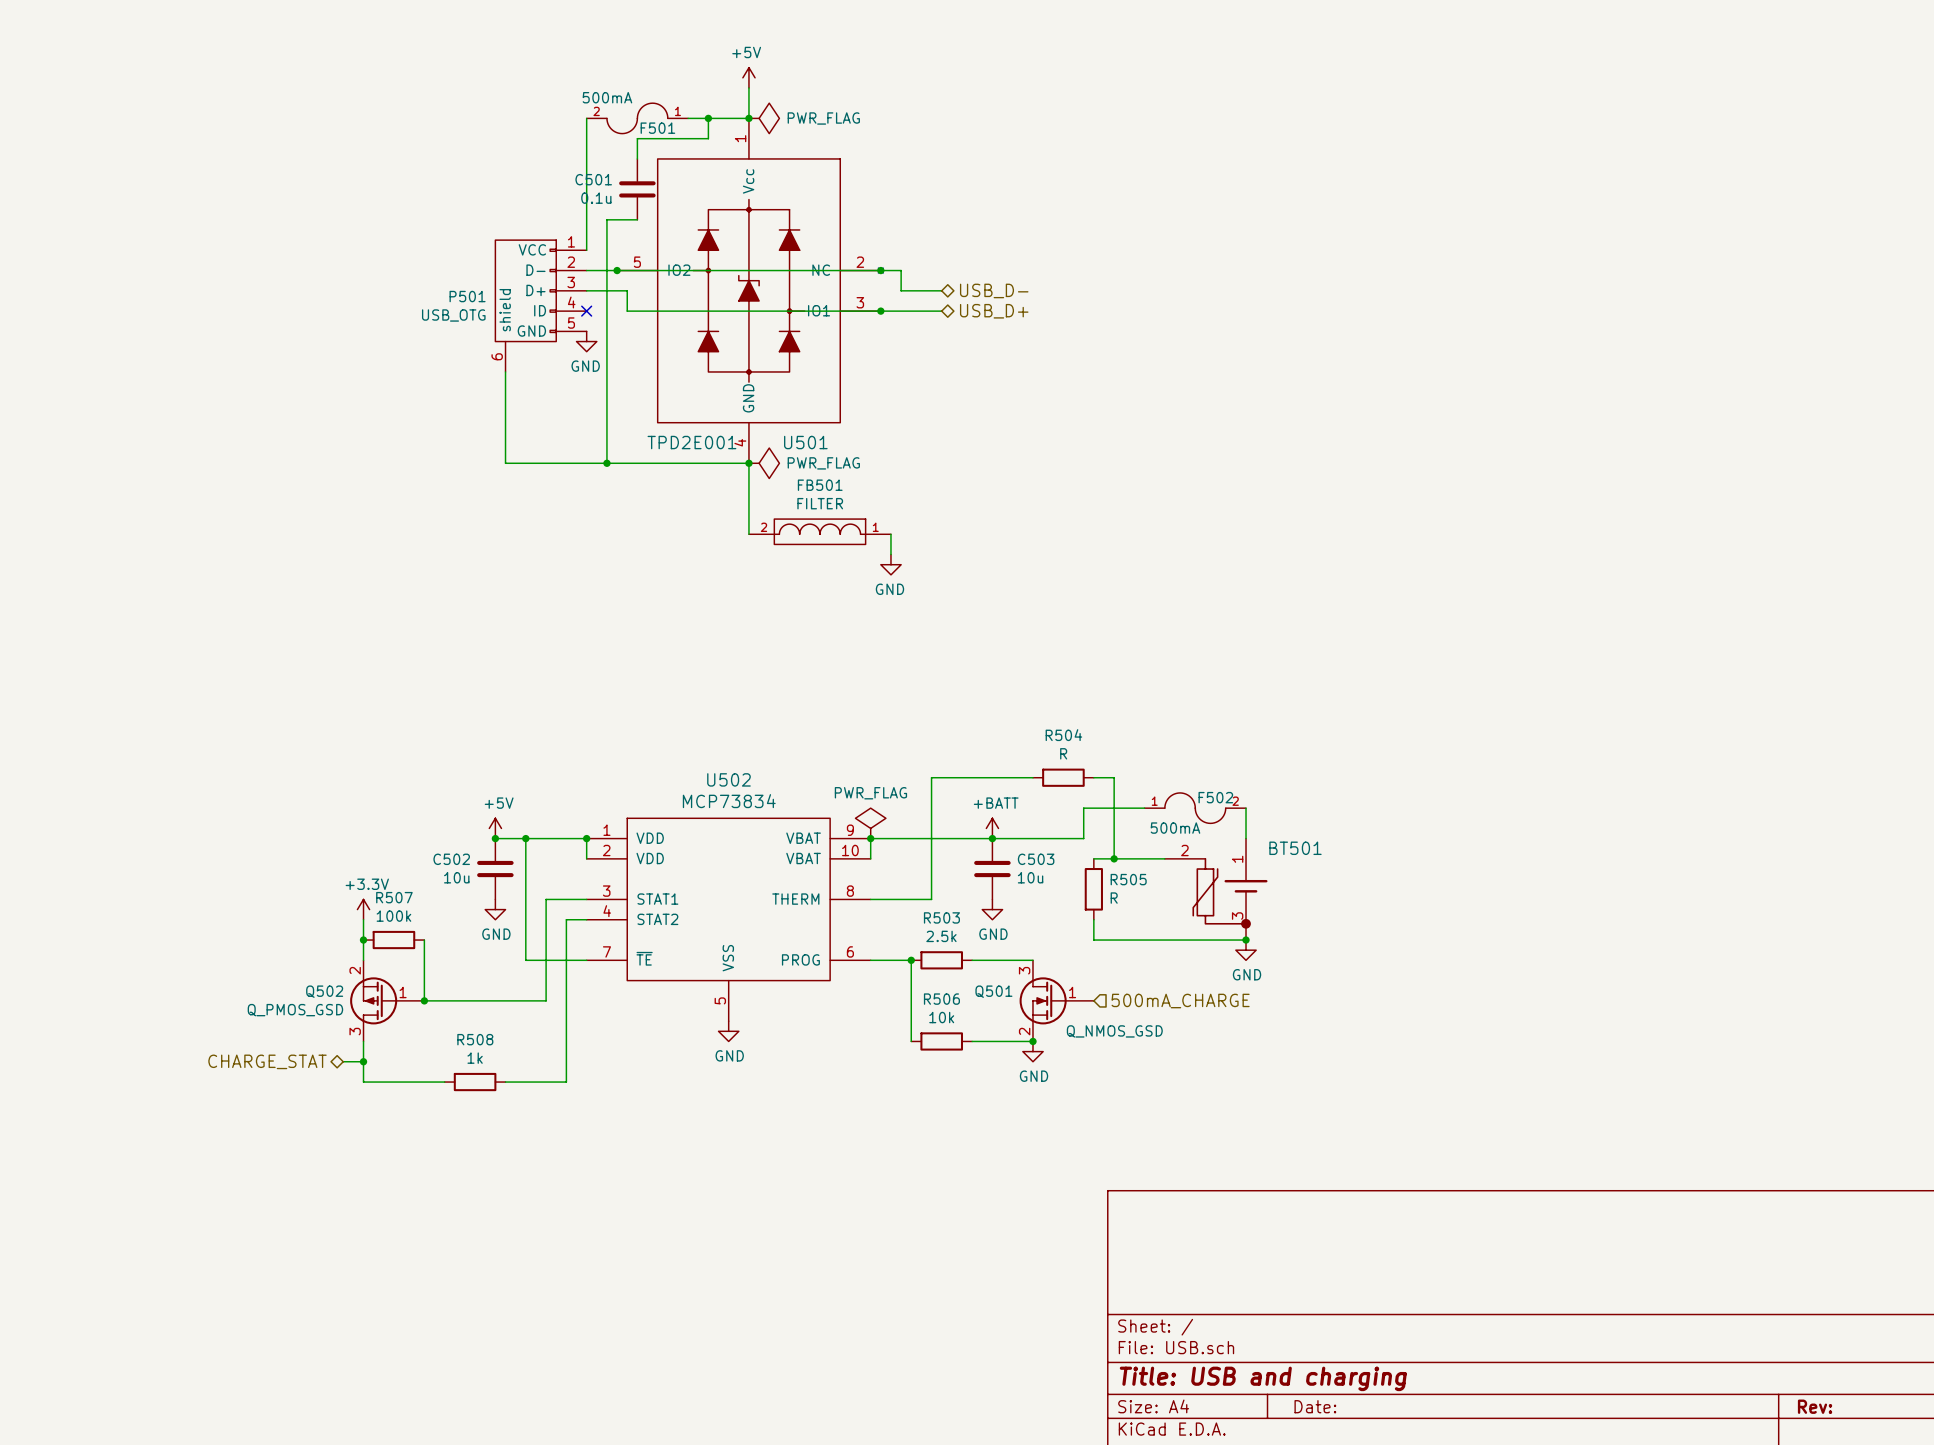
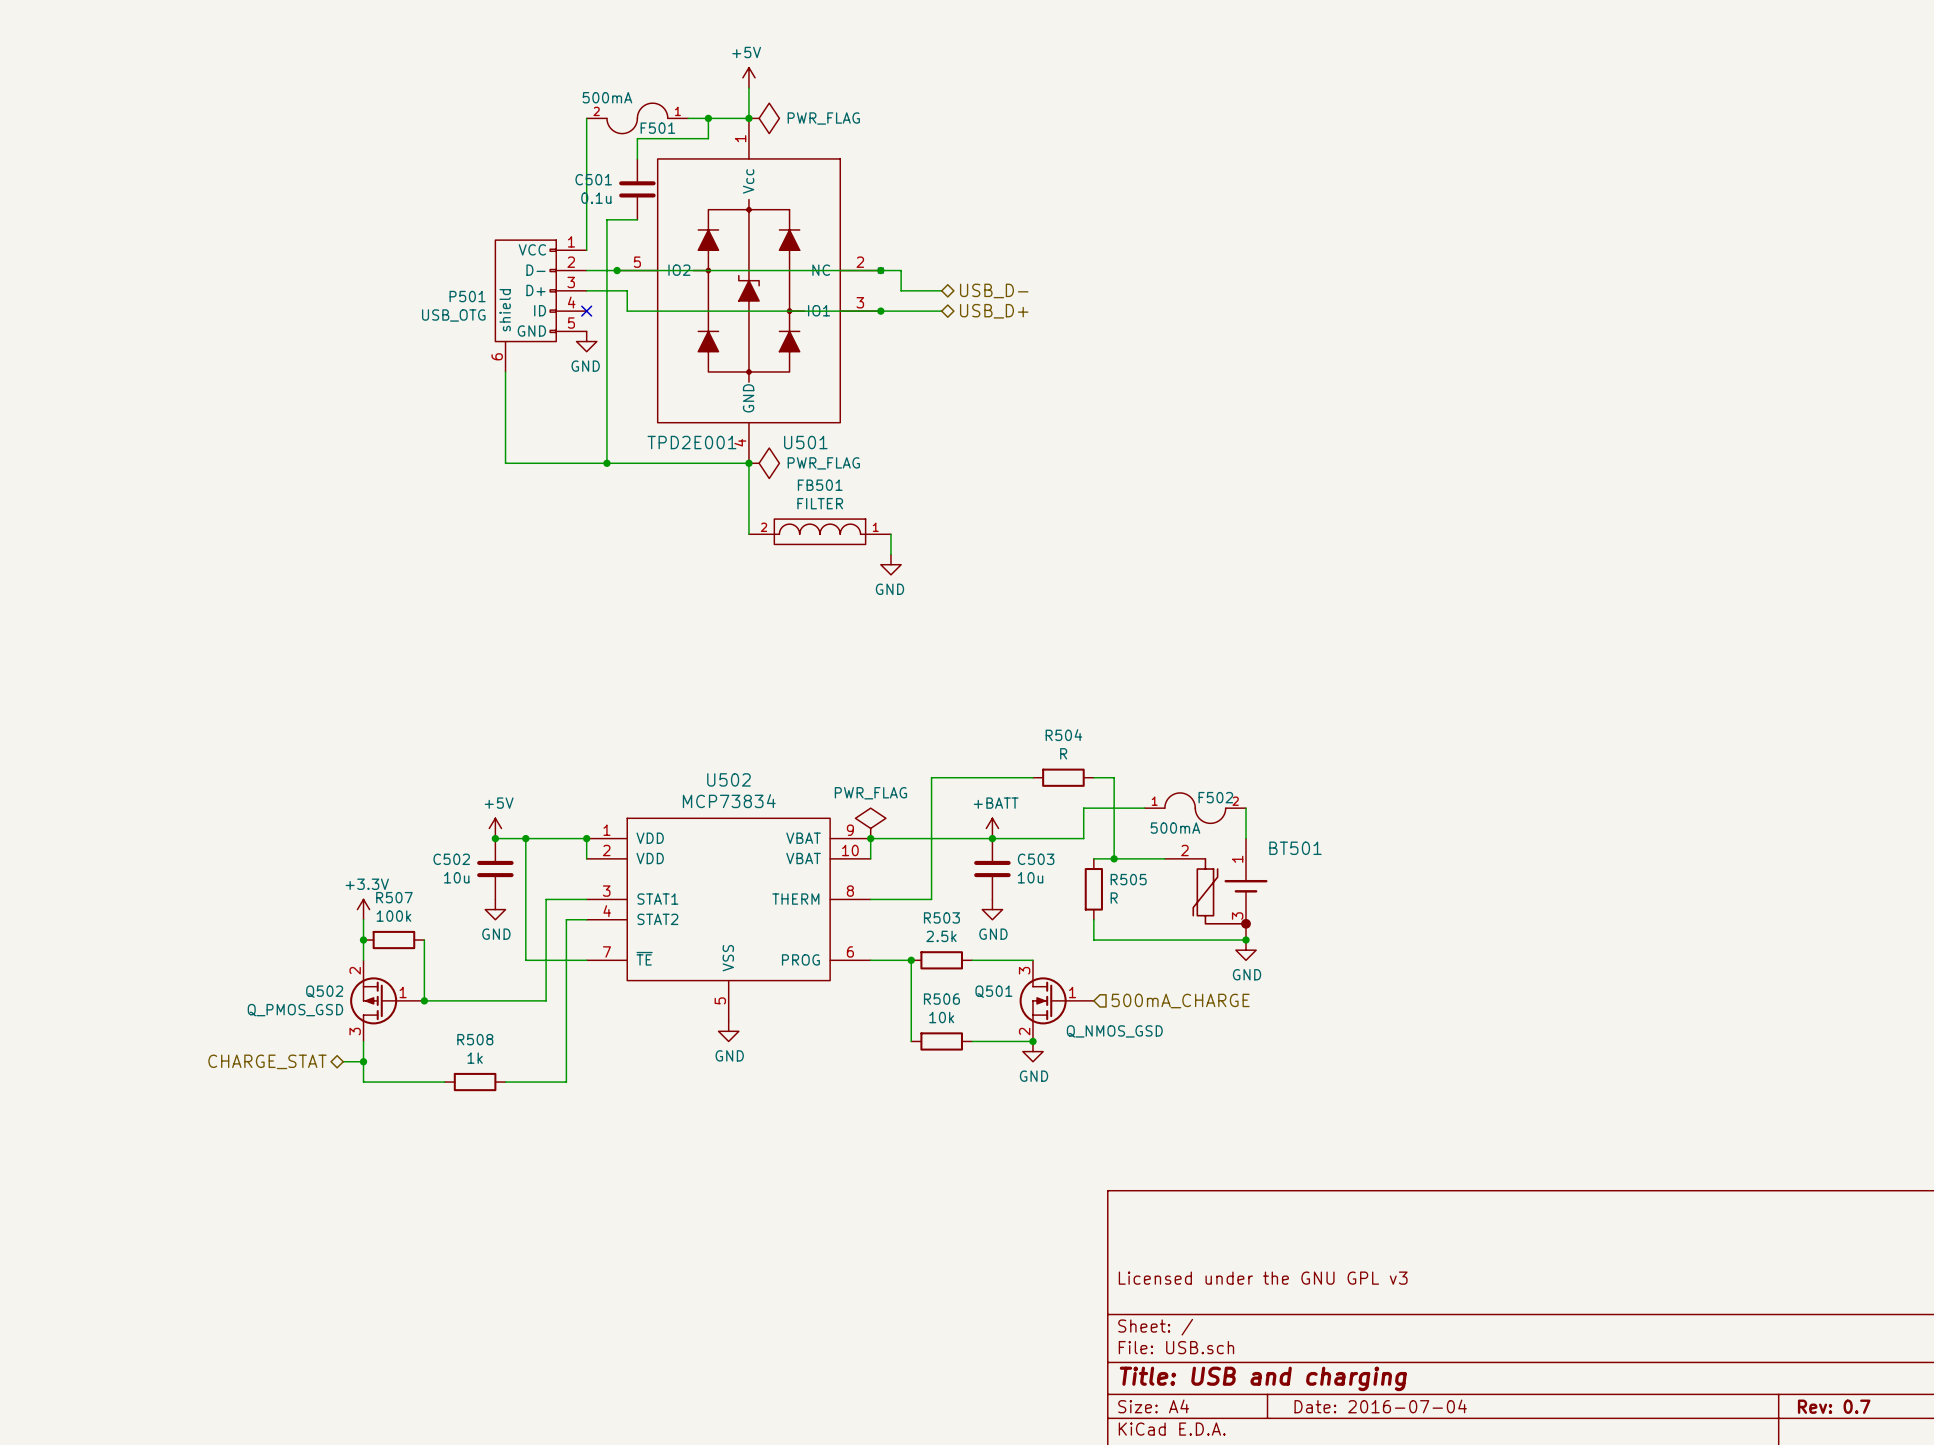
title block: none -> Licensed under the GNU GPL v3 (1263, 1278)
title block: Date: (1315, 1406) -> Date: 2016-07-04 (1380, 1406)
title block: Rev: (1815, 1406) -> Rev: 0.7 (1834, 1406)

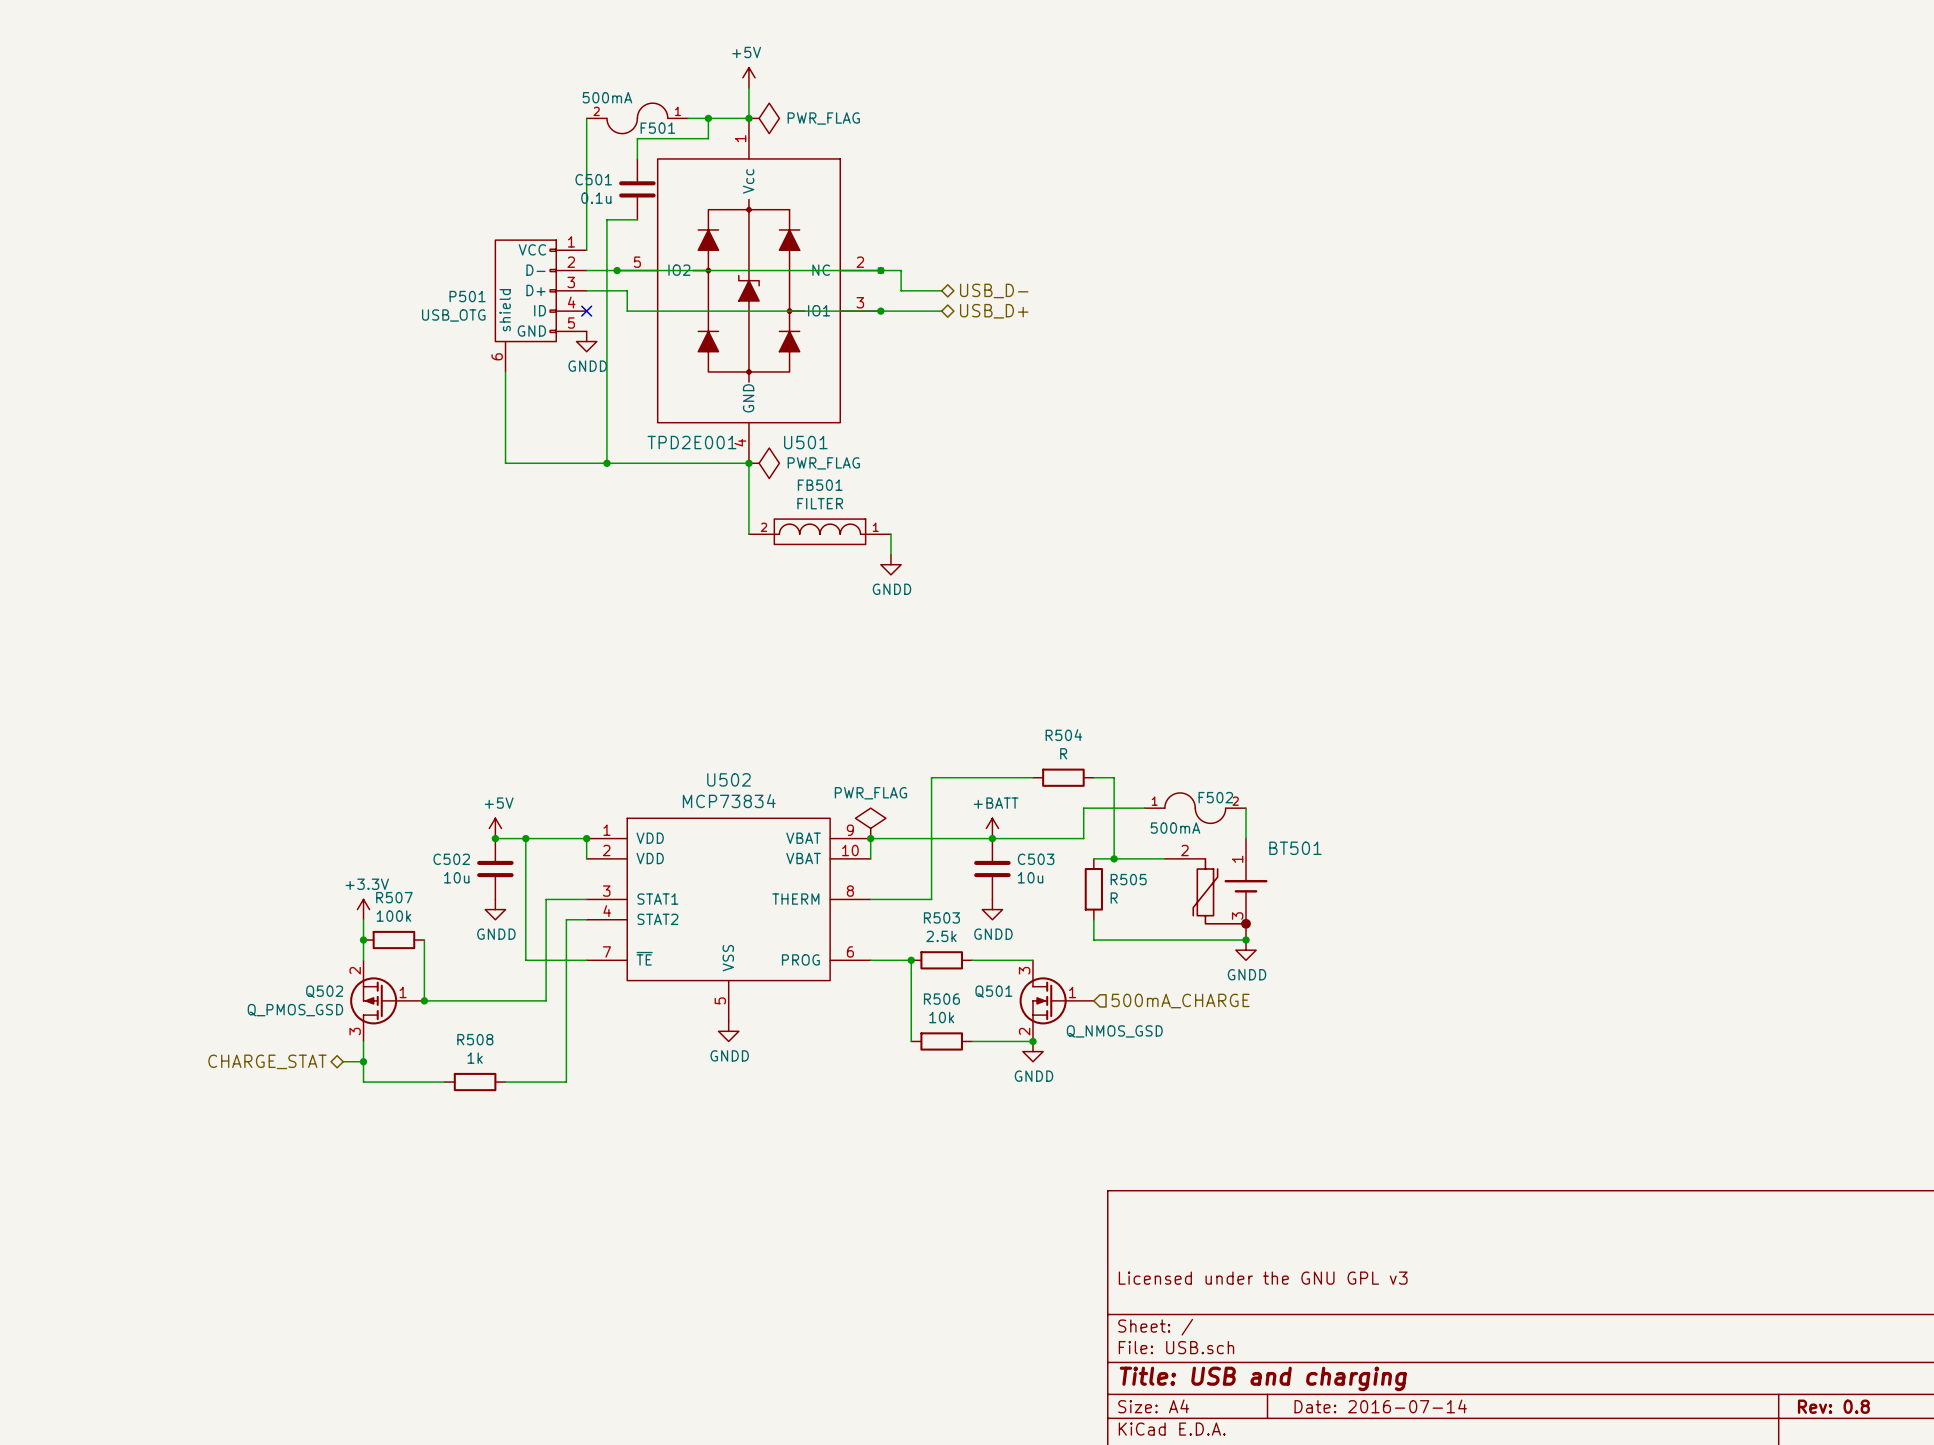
power symbol: GND (586, 341) -> GNDD (586, 341)
power symbol: GND (890, 564) -> GNDD (890, 564)
power symbol: GND (495, 909) -> GNDD (495, 909)
power symbol: GND (992, 909) -> GNDD (992, 909)
power symbol: GND (1246, 950) -> GNDD (1246, 950)
power symbol: GND (728, 1031) -> GNDD (728, 1031)
power symbol: GND (1032, 1051) -> GNDD (1032, 1051)
title block: Date: 2016-07-04 (1380, 1406) -> Date: 2016-07-14 (1380, 1406)
title block: Rev: 0.7 (1834, 1406) -> Rev: 0.8 (1833, 1406)

